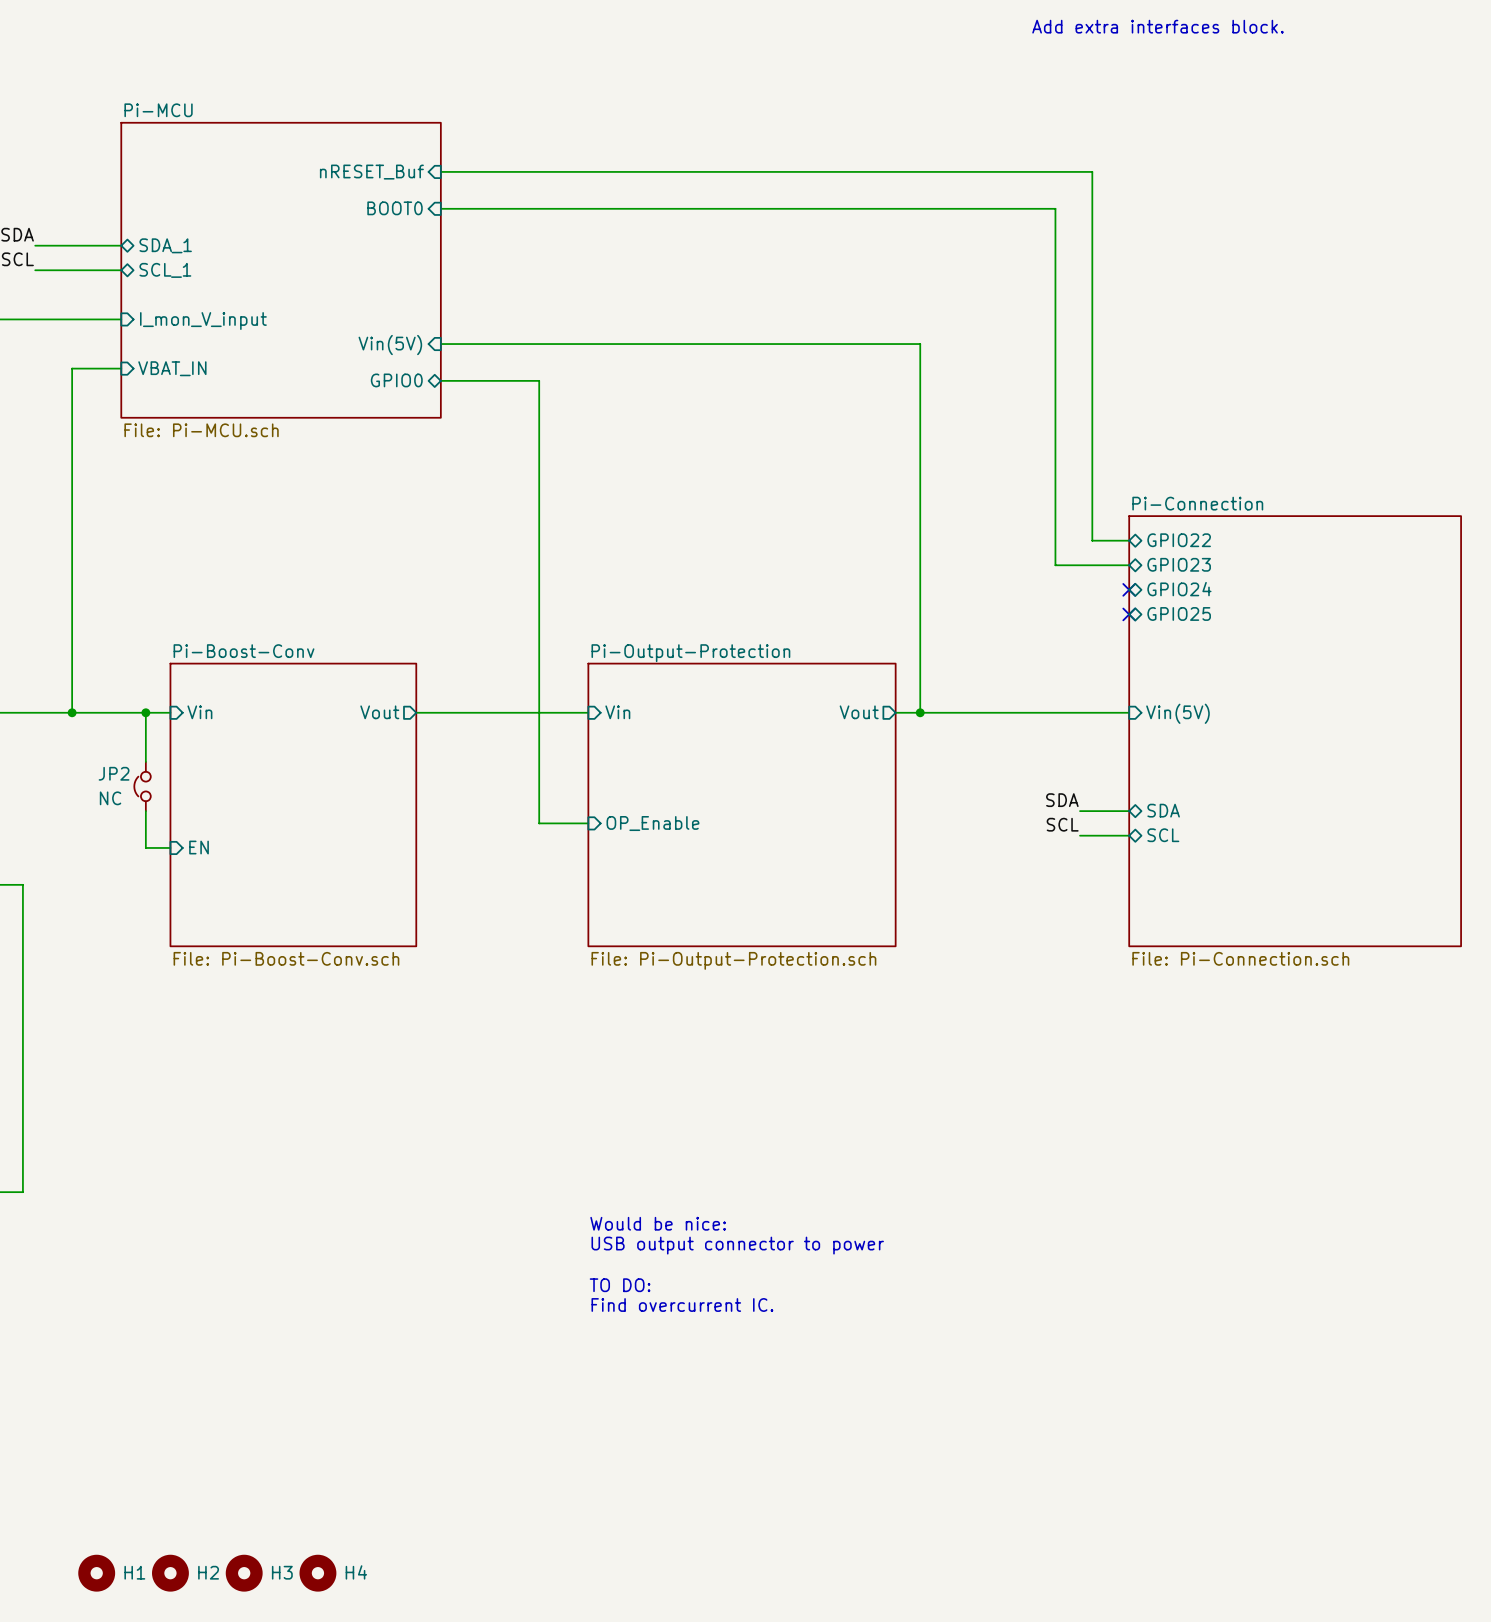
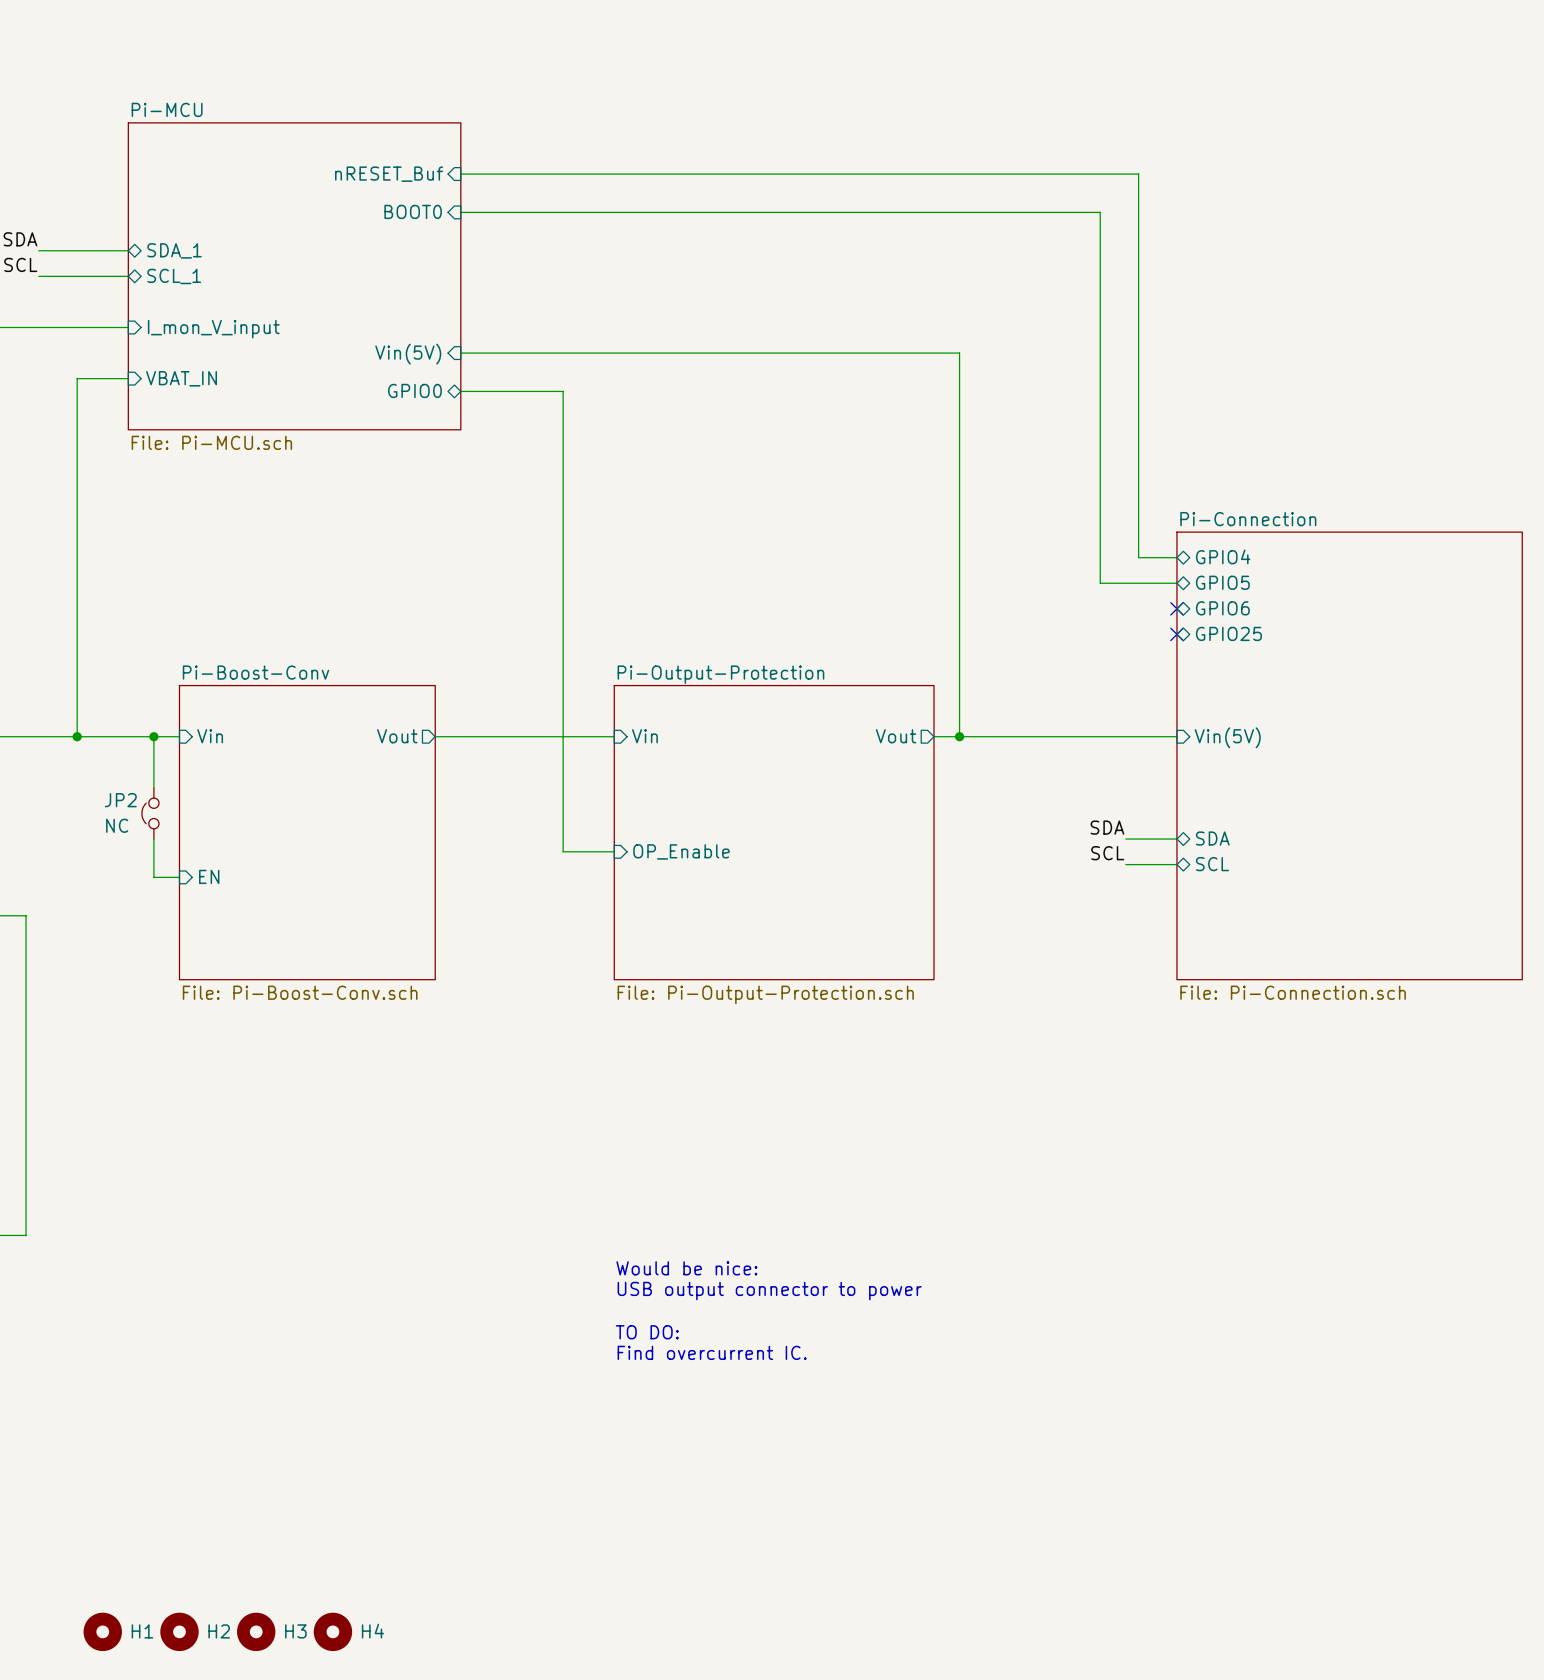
text: Add extra interfaces block. (1157, 26) -> none
sheet pin: GPIO22 (1179, 540) -> GPIO4 (1223, 556)
sheet pin: GPIO23 (1179, 564) -> GPIO5 (1222, 582)
sheet pin: GPIO24 (1179, 589) -> GPIO6 (1222, 608)

